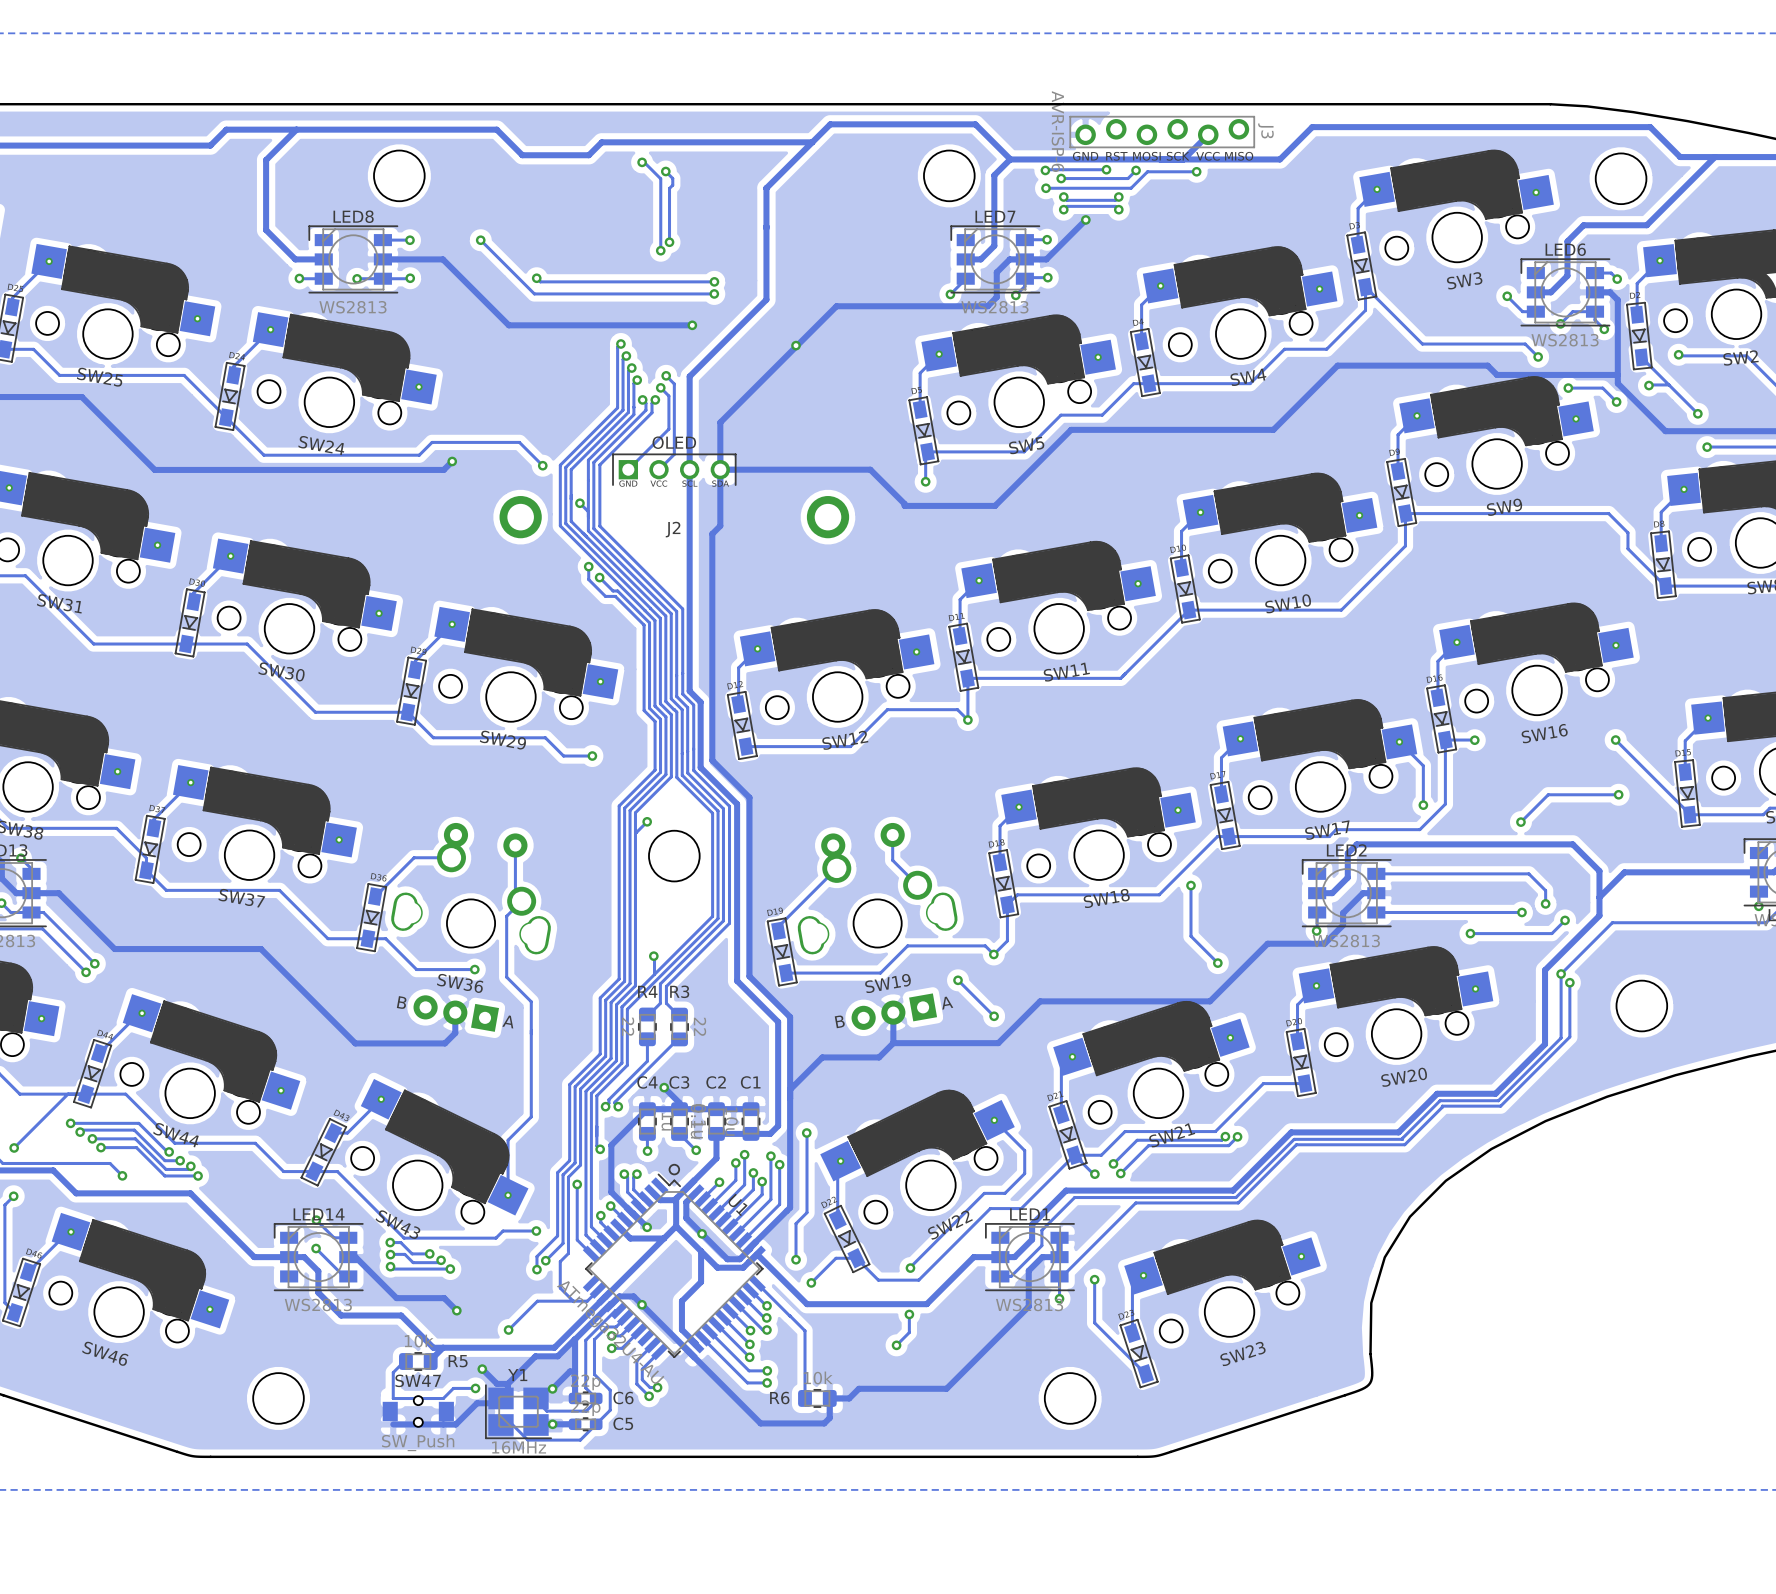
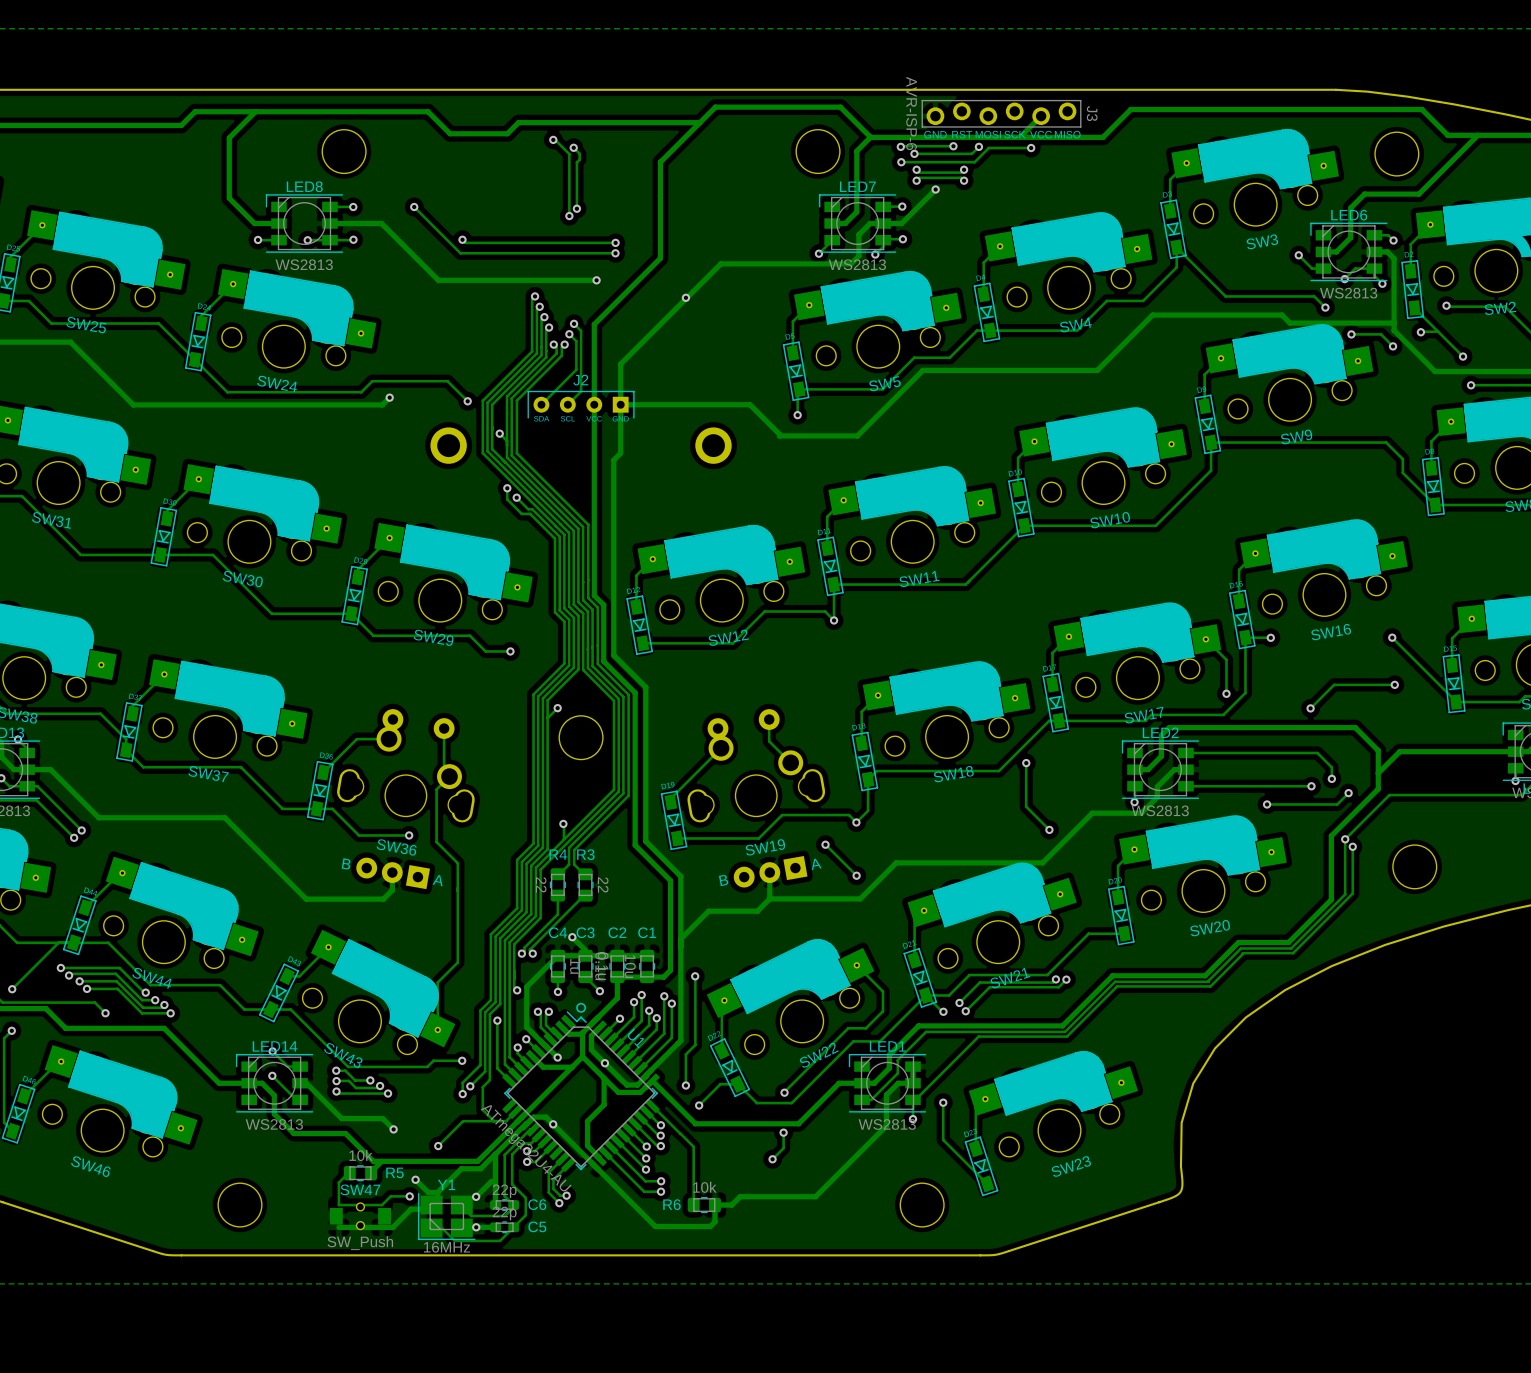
J2 footprint: [612, 453, 737, 486] -> [527, 390, 635, 419]
J2 name position: J2 (673, 529) -> J2 (580, 380)

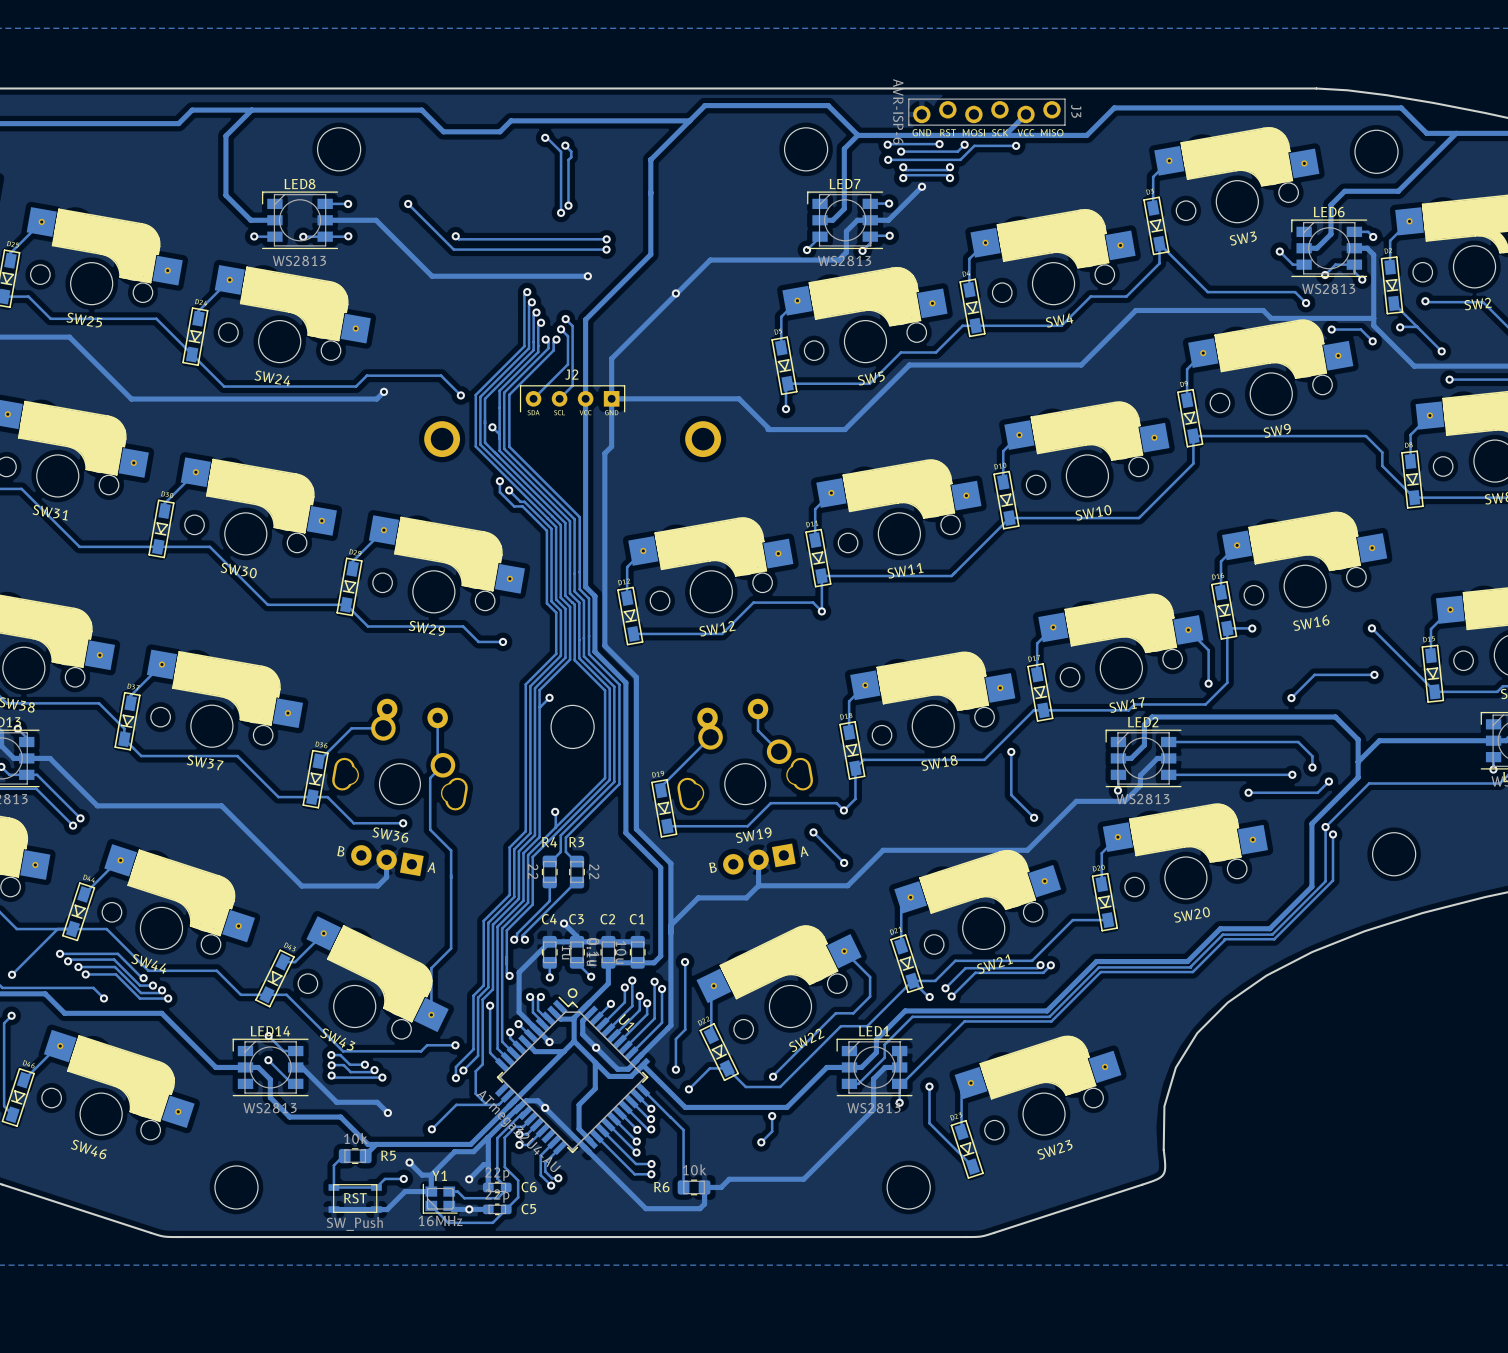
Y1 footprint: [418, 1192, 476, 1240] -> [422, 1183, 458, 1214]
SW47: SW_Push (360, 1216) -> none
part: none -> SW_Push (355, 1198)

